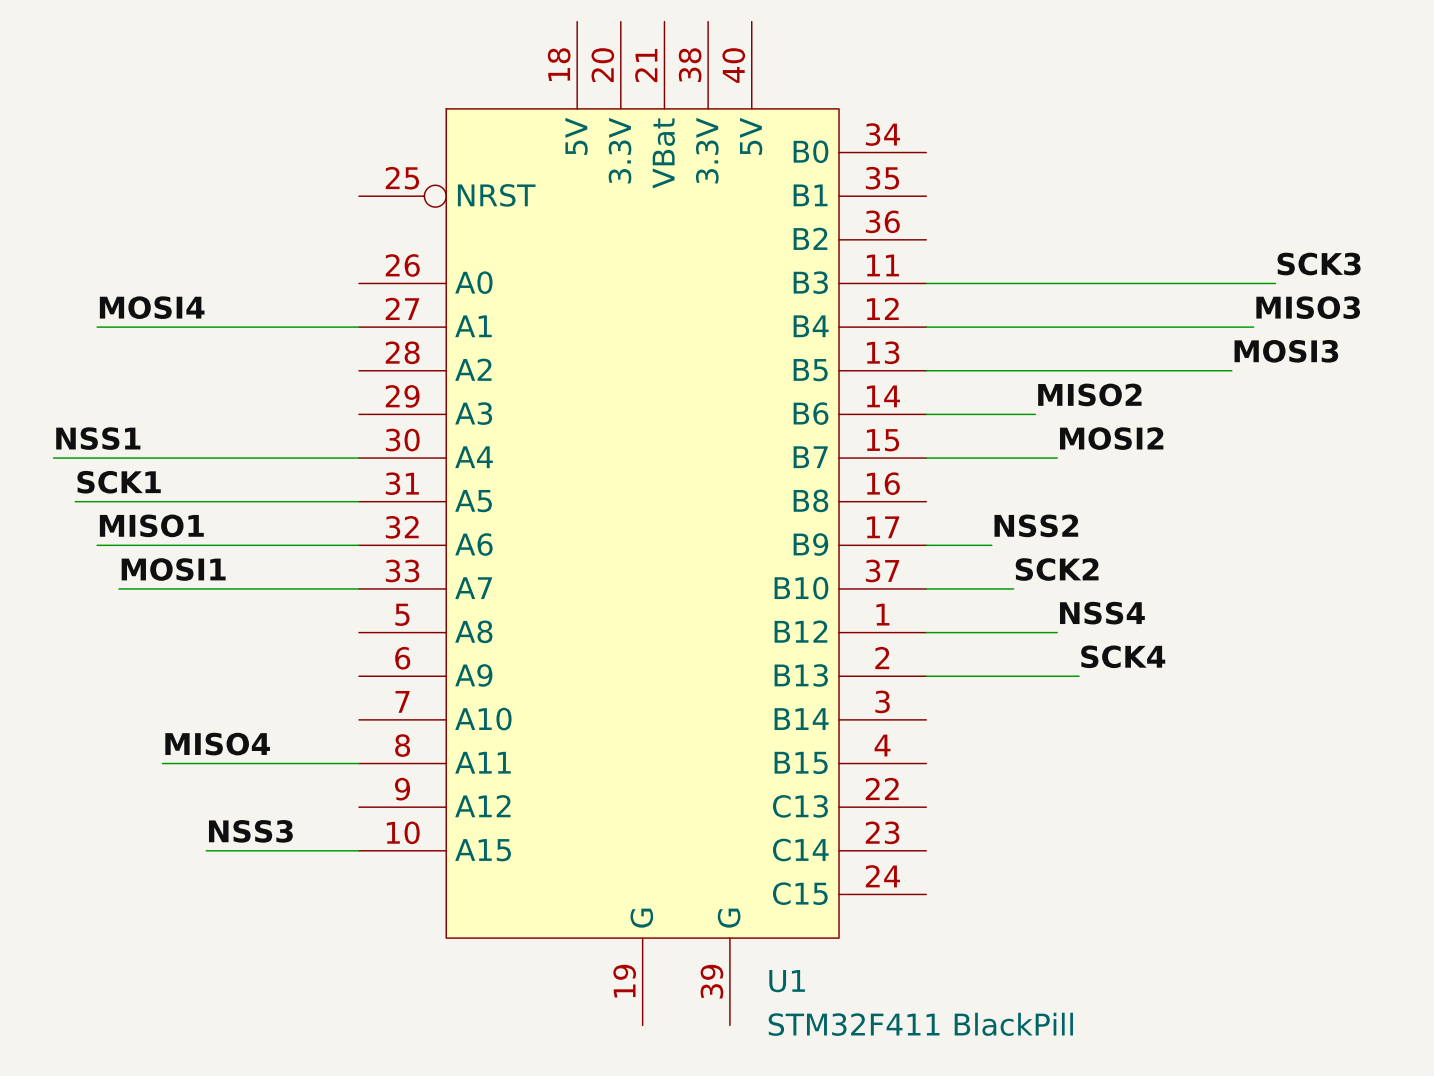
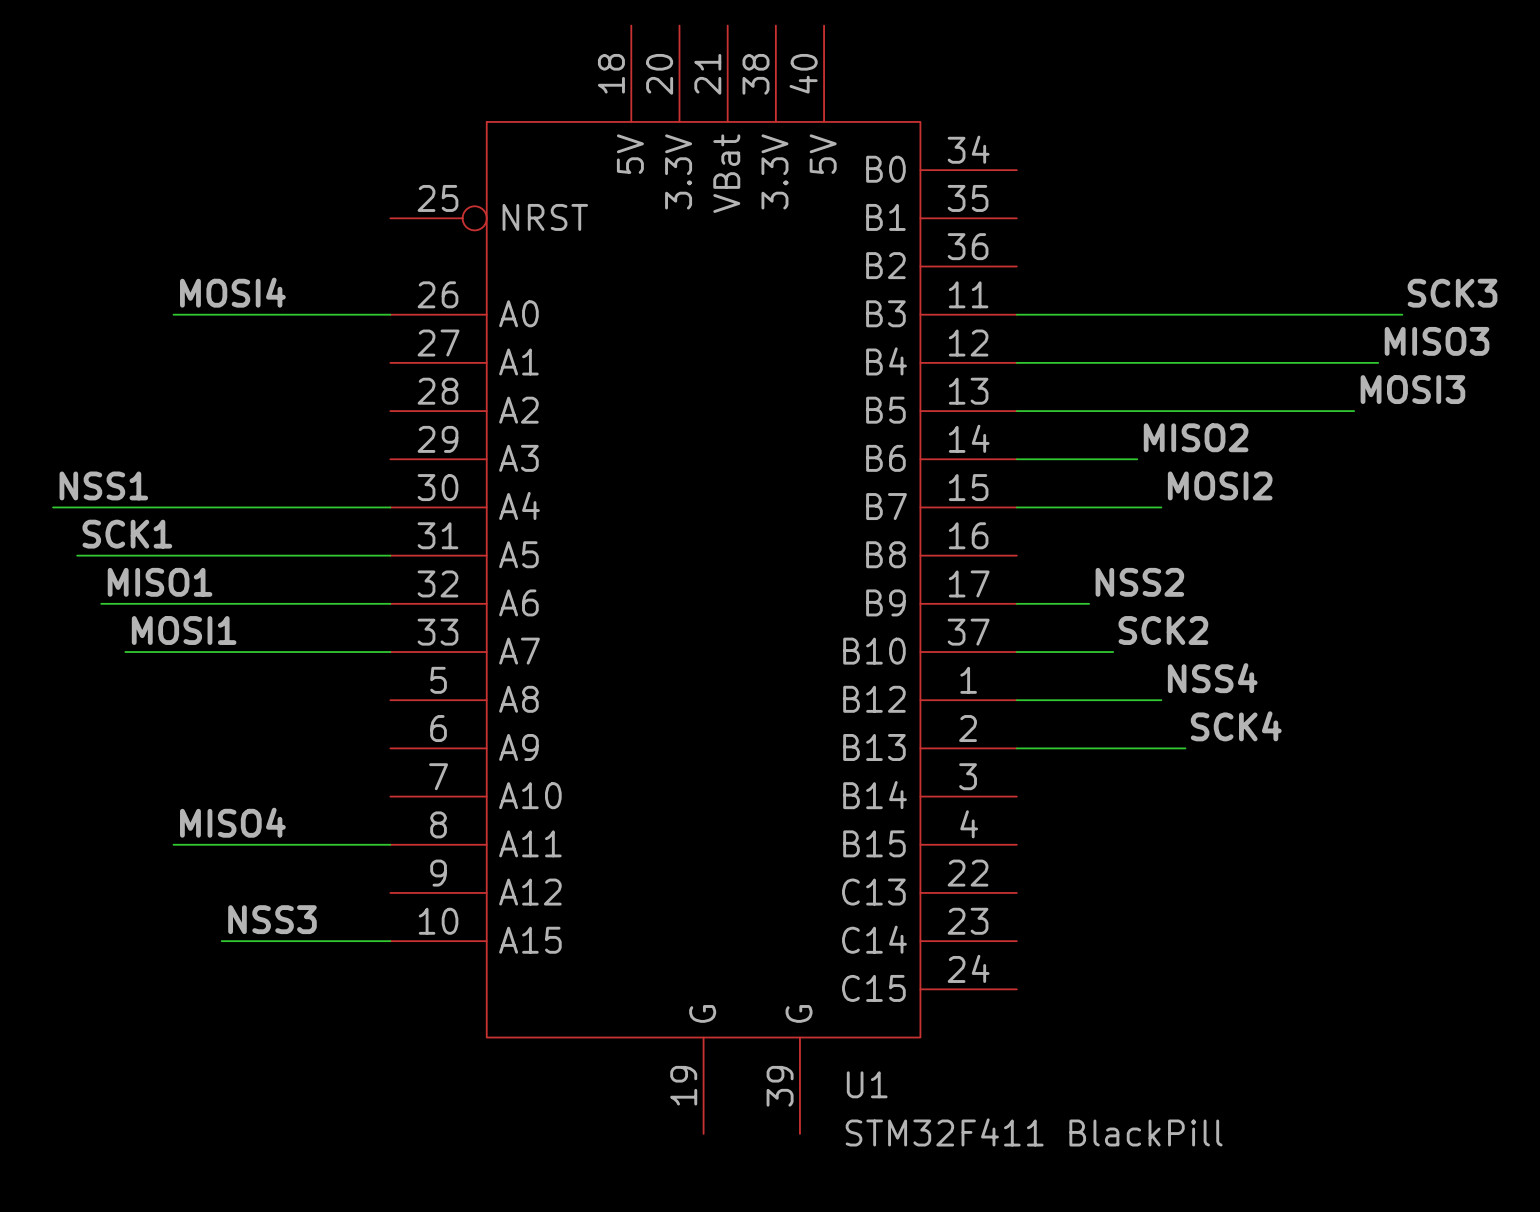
wire: none -> (173, 314) (390, 314)
label position: MOSI4 (152, 307) -> MOSI4 (232, 292)
wire: (97, 327) (358, 327) -> none

